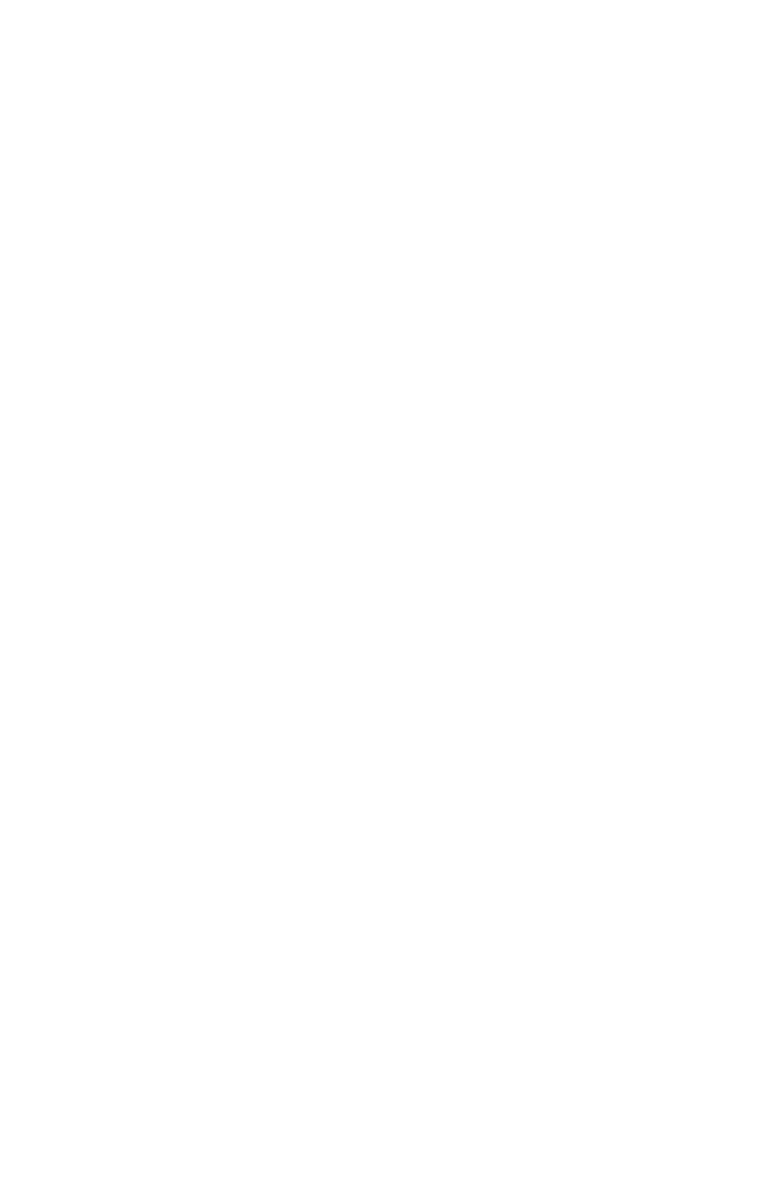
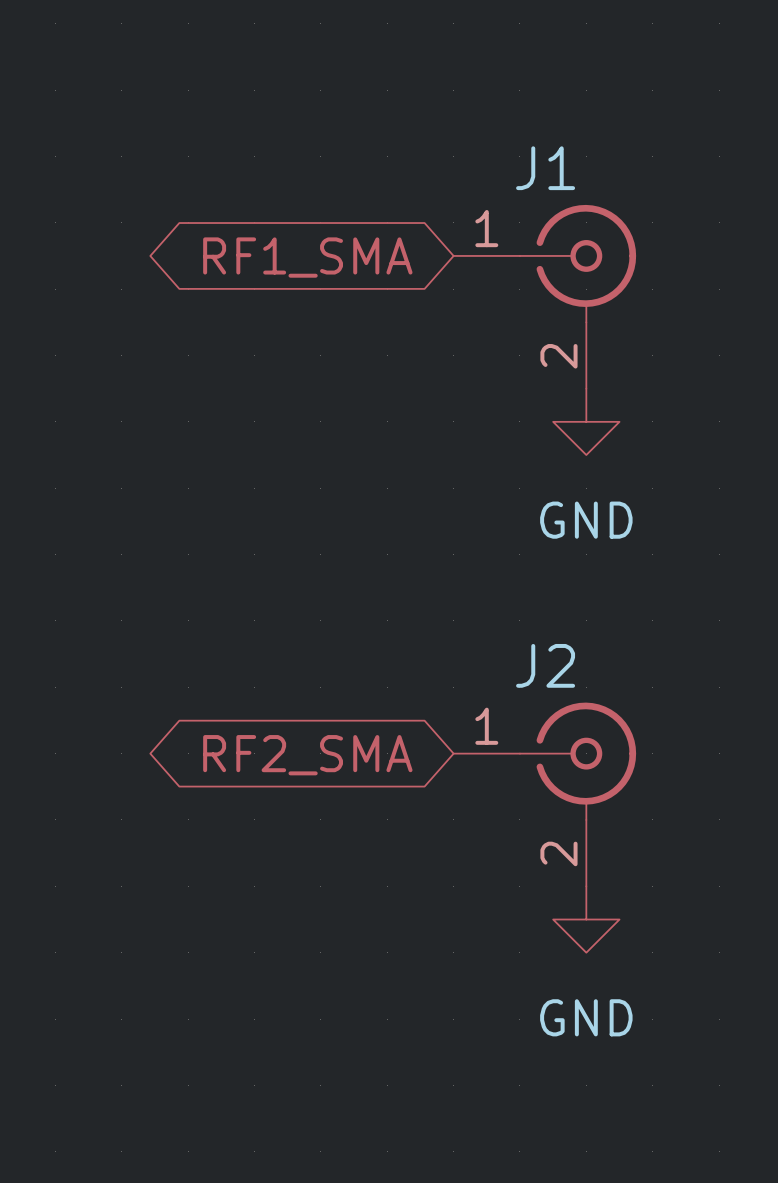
global label: none -> RF1_SMA (307, 257)
J1: none -> (544, 296)
power symbol: none -> GND (586, 421)
global label: none -> RF2_SMA (307, 755)
J2: none -> (544, 794)
power symbol: none -> GND (586, 919)

